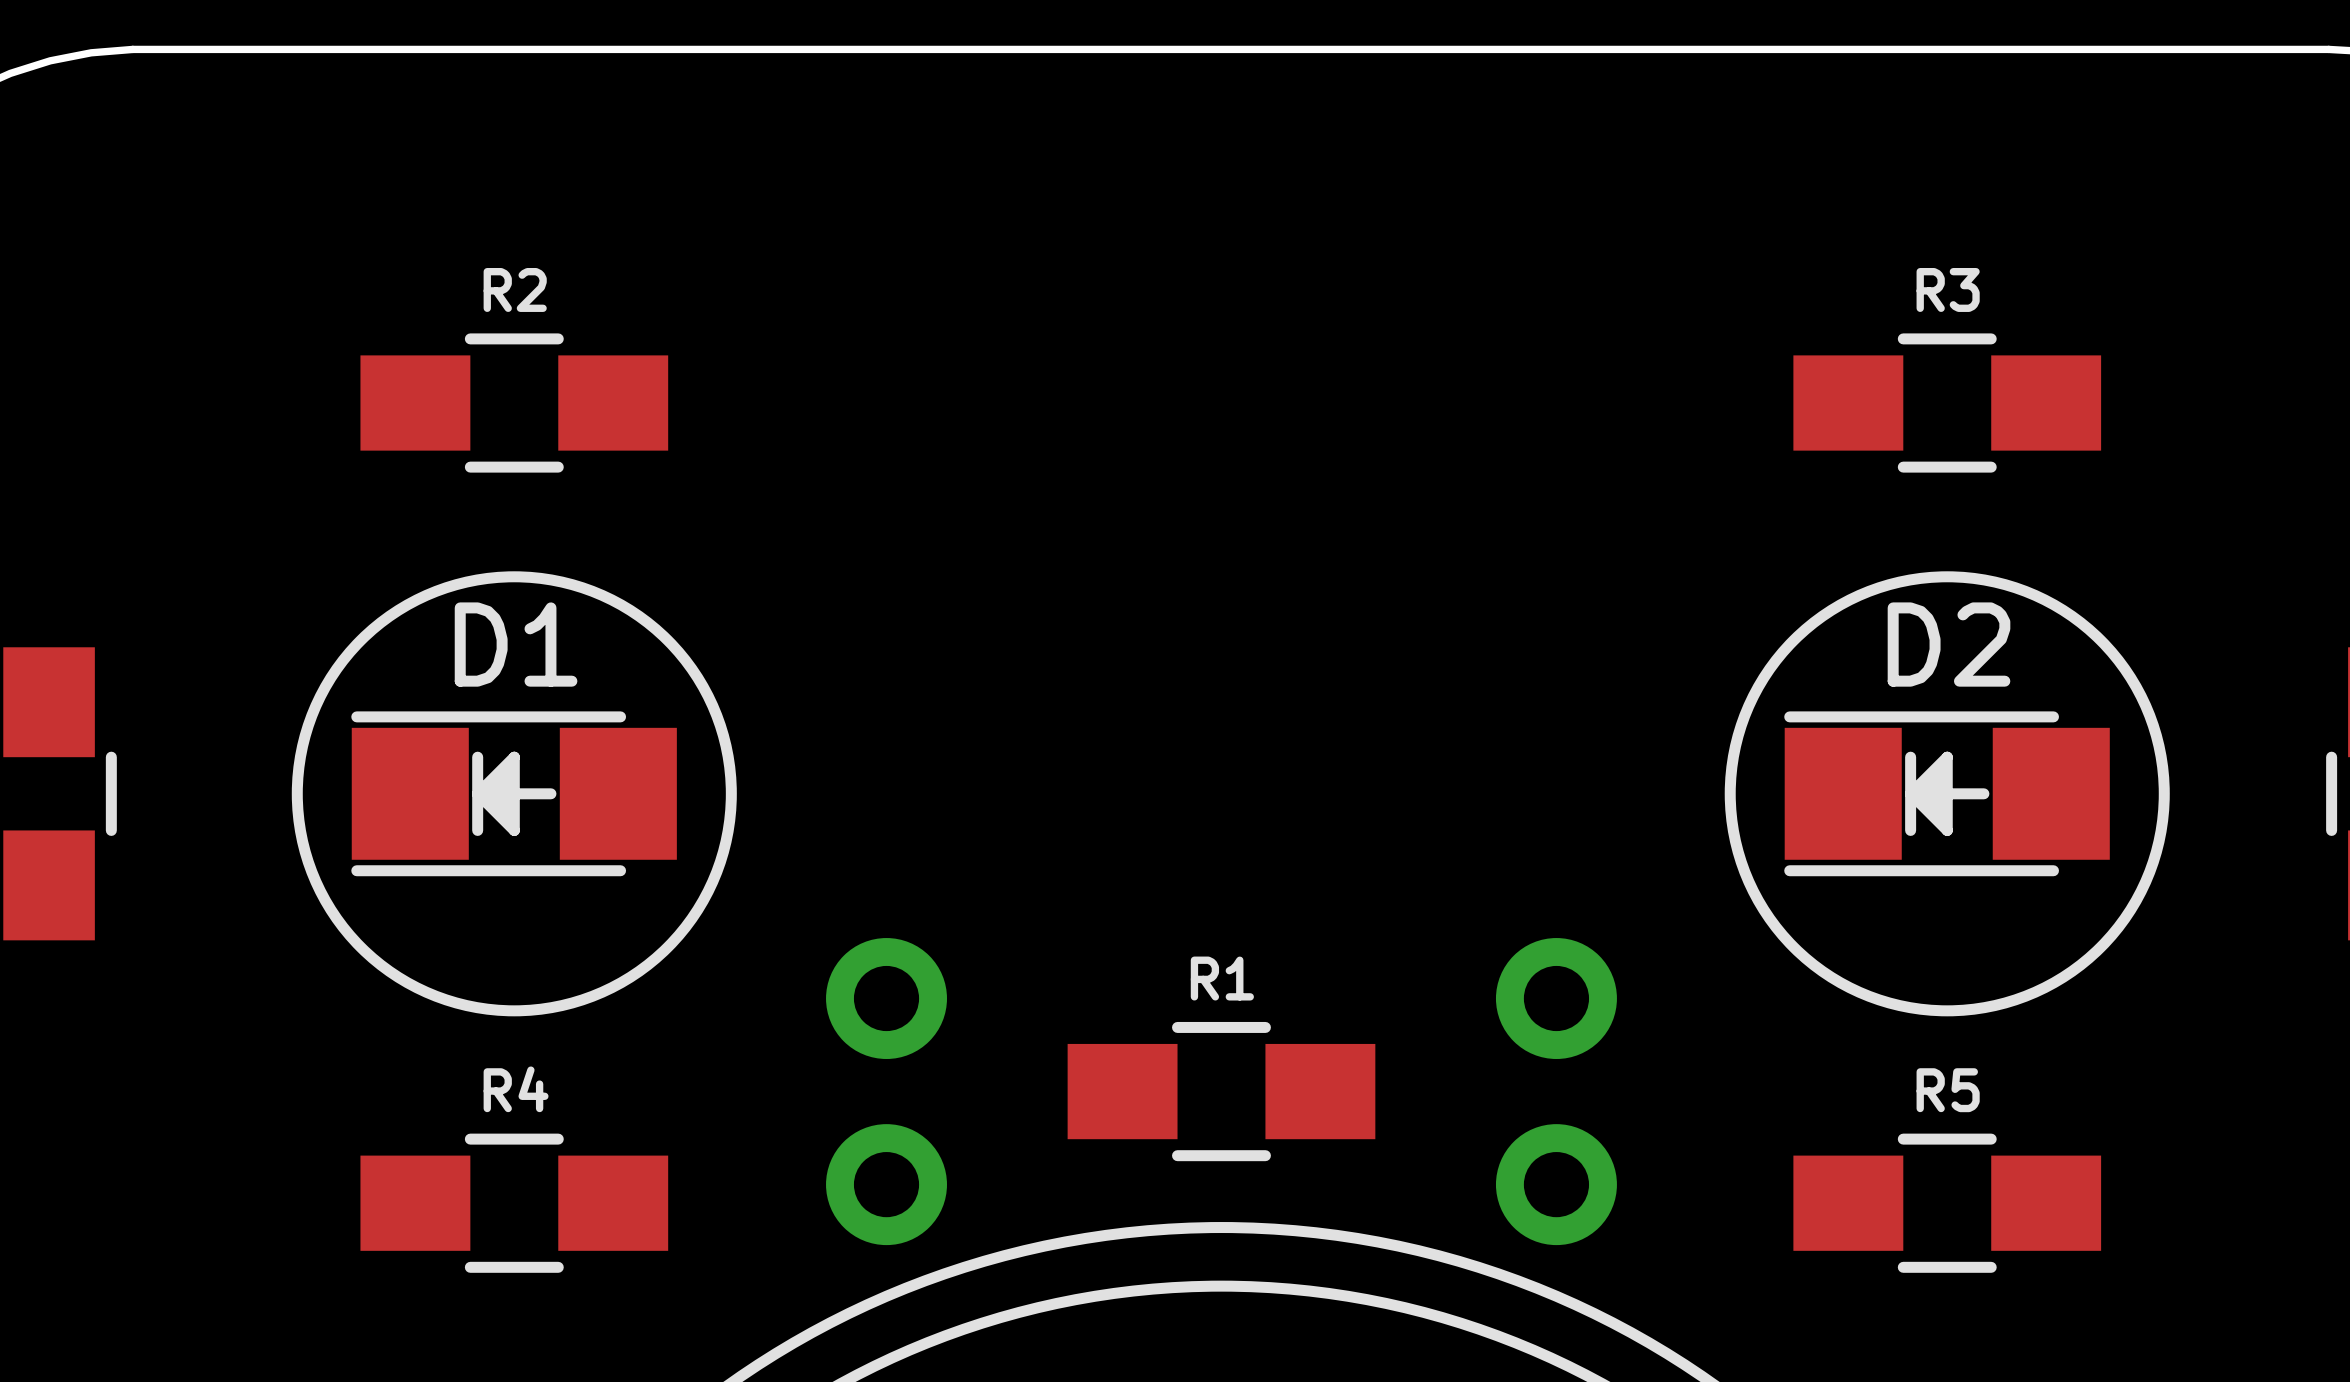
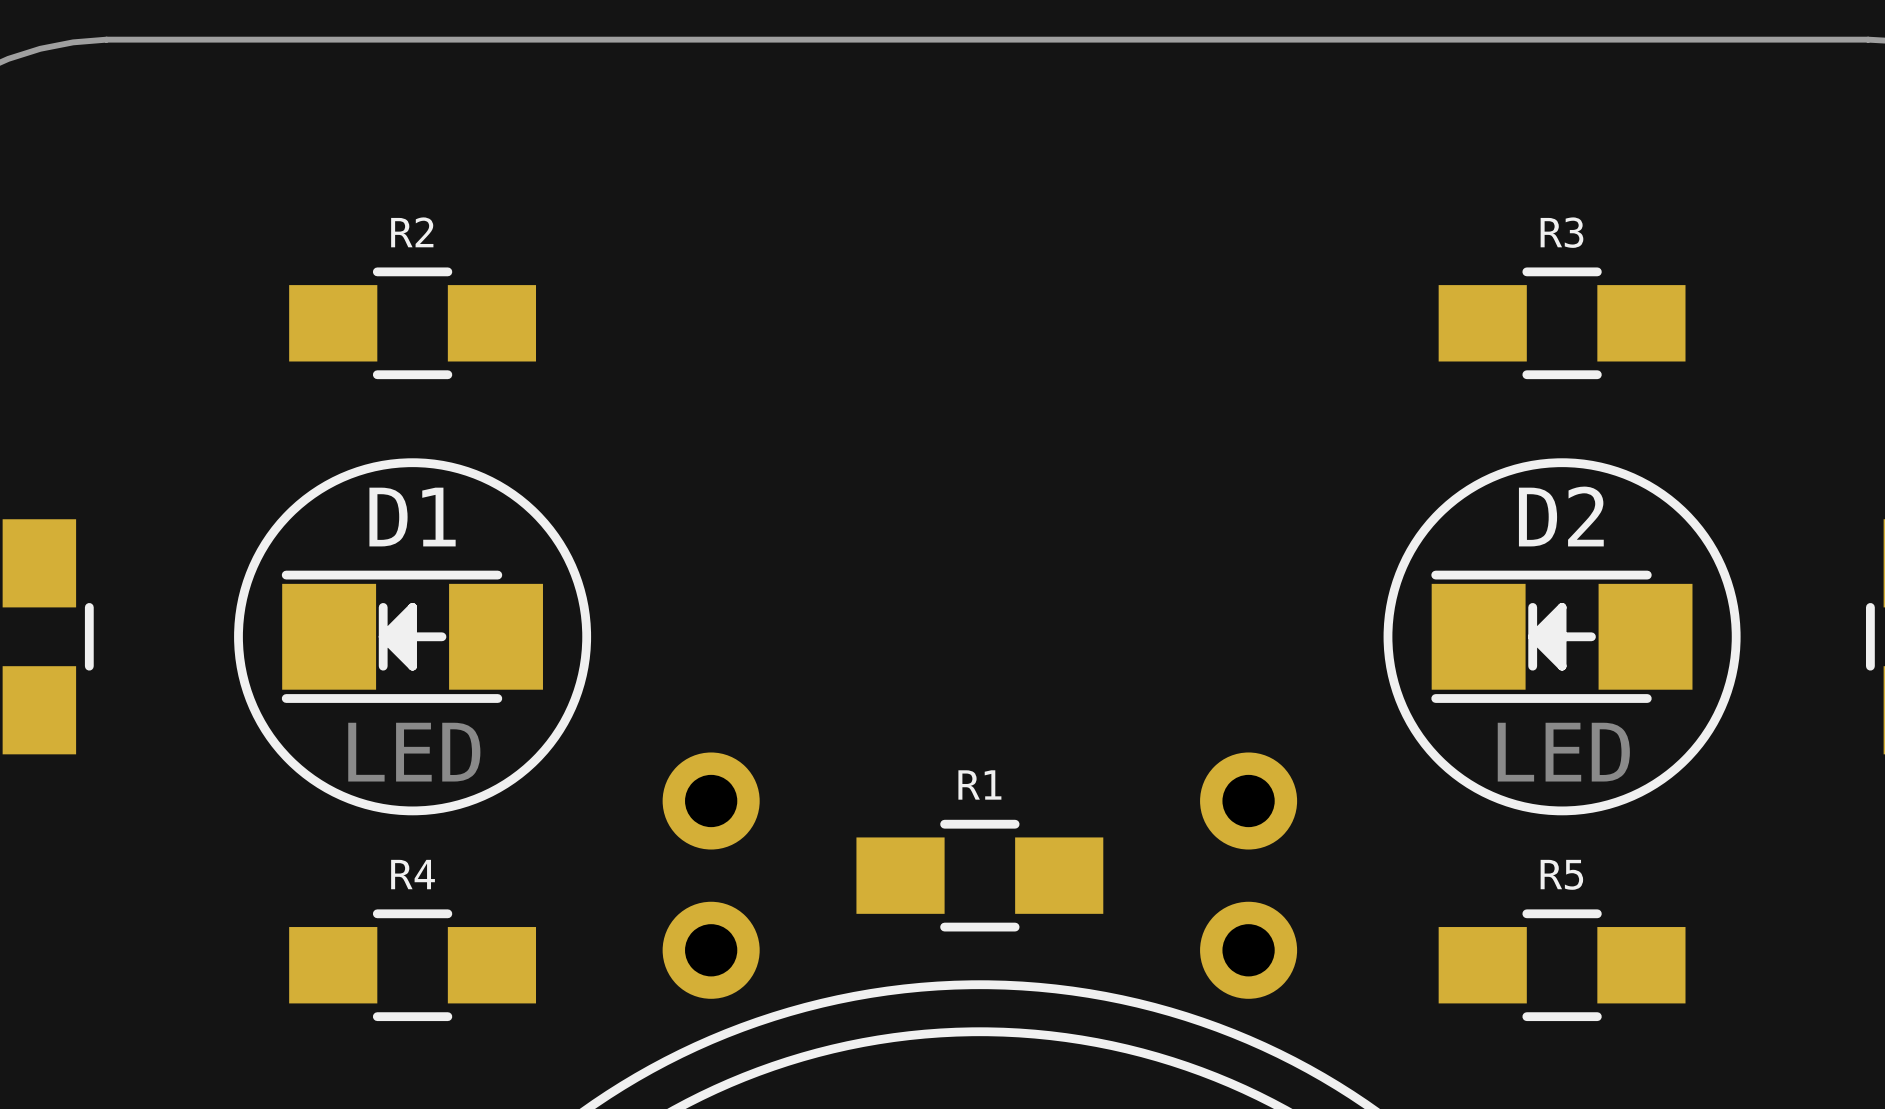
D1 value: none -> LED (414, 752)
D2 value: none -> LED (1563, 752)

